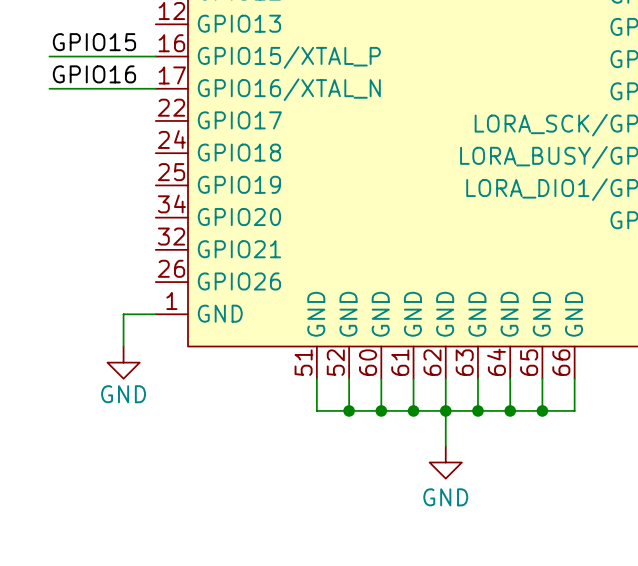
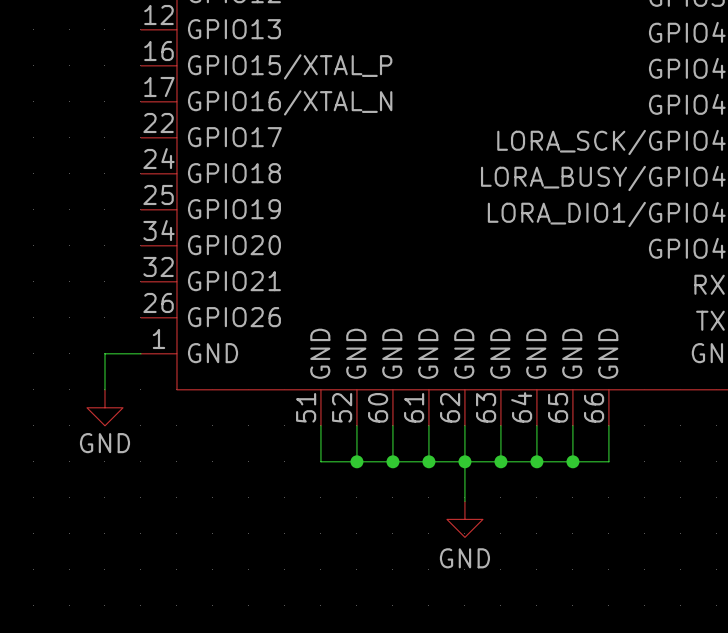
label: GPIO15 (94, 42) -> none
wire: (49, 56) (155, 56) -> none
label: GPIO16 (94, 74) -> none
wire: (49, 88) (155, 88) -> none

